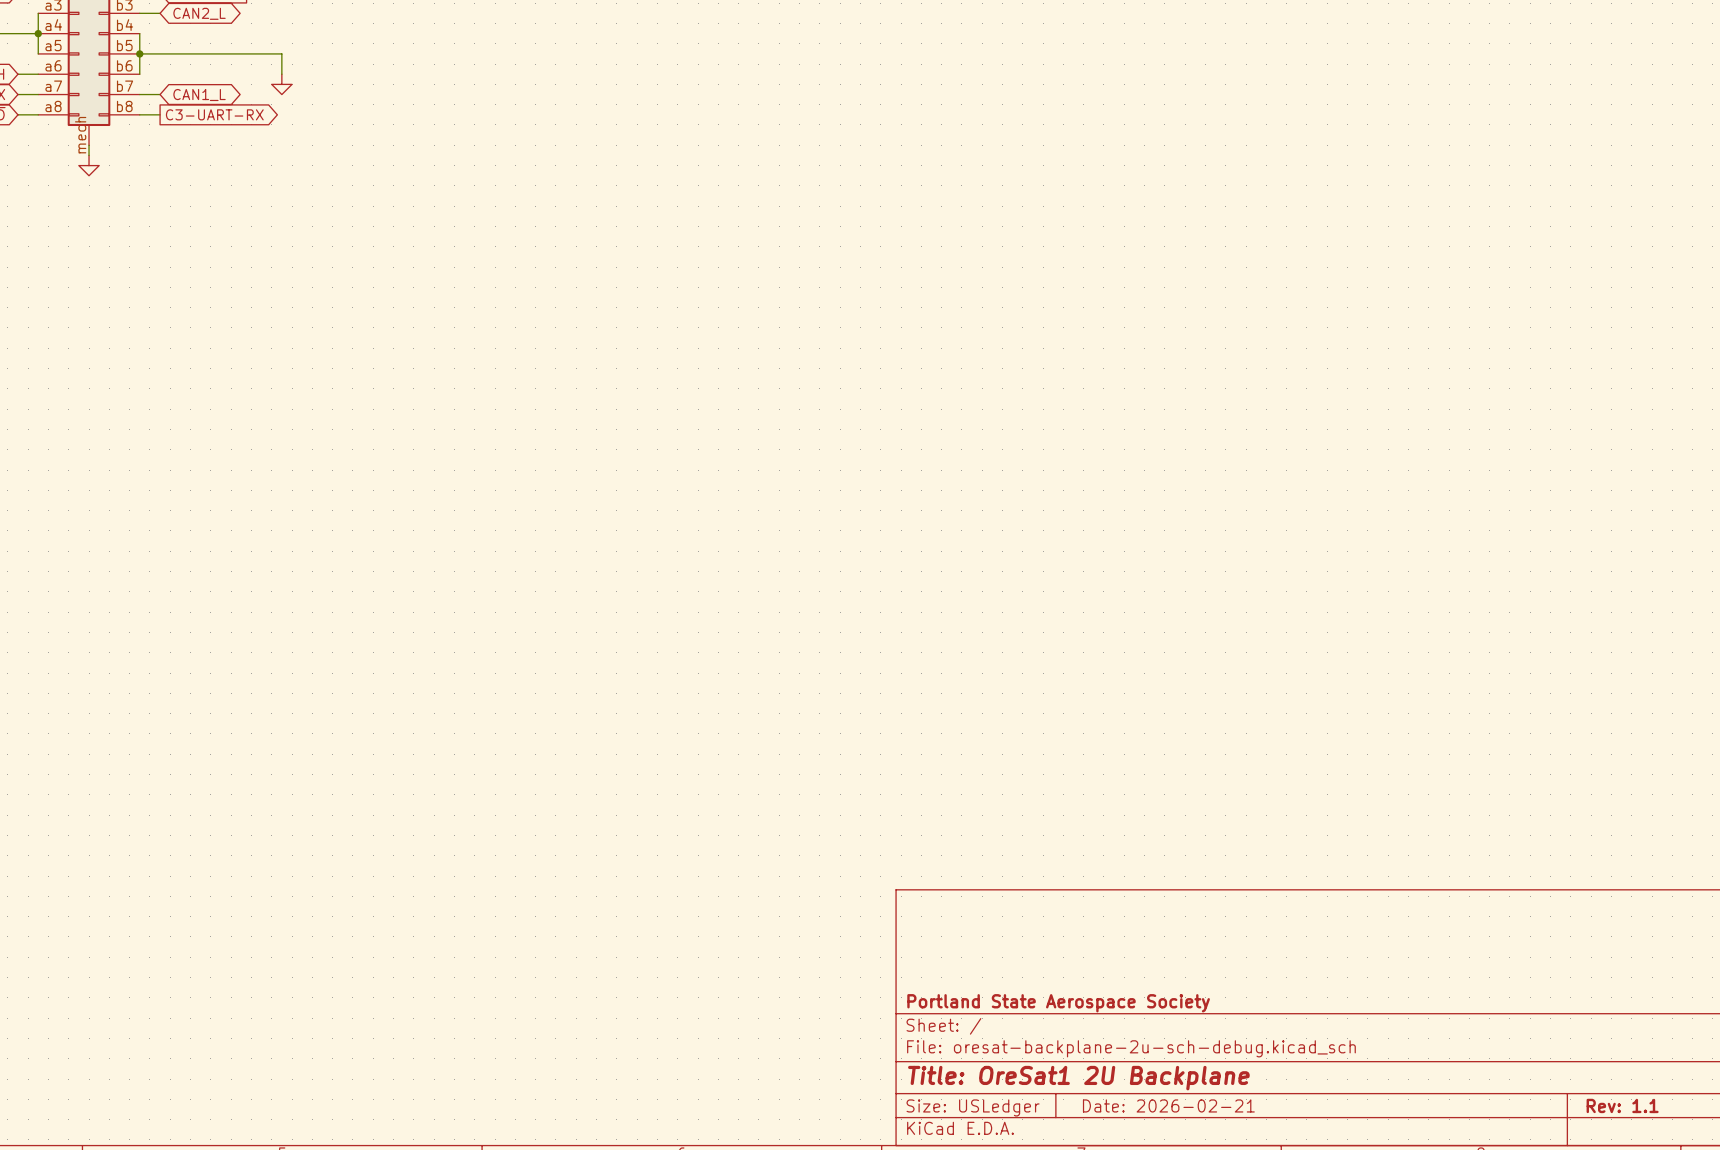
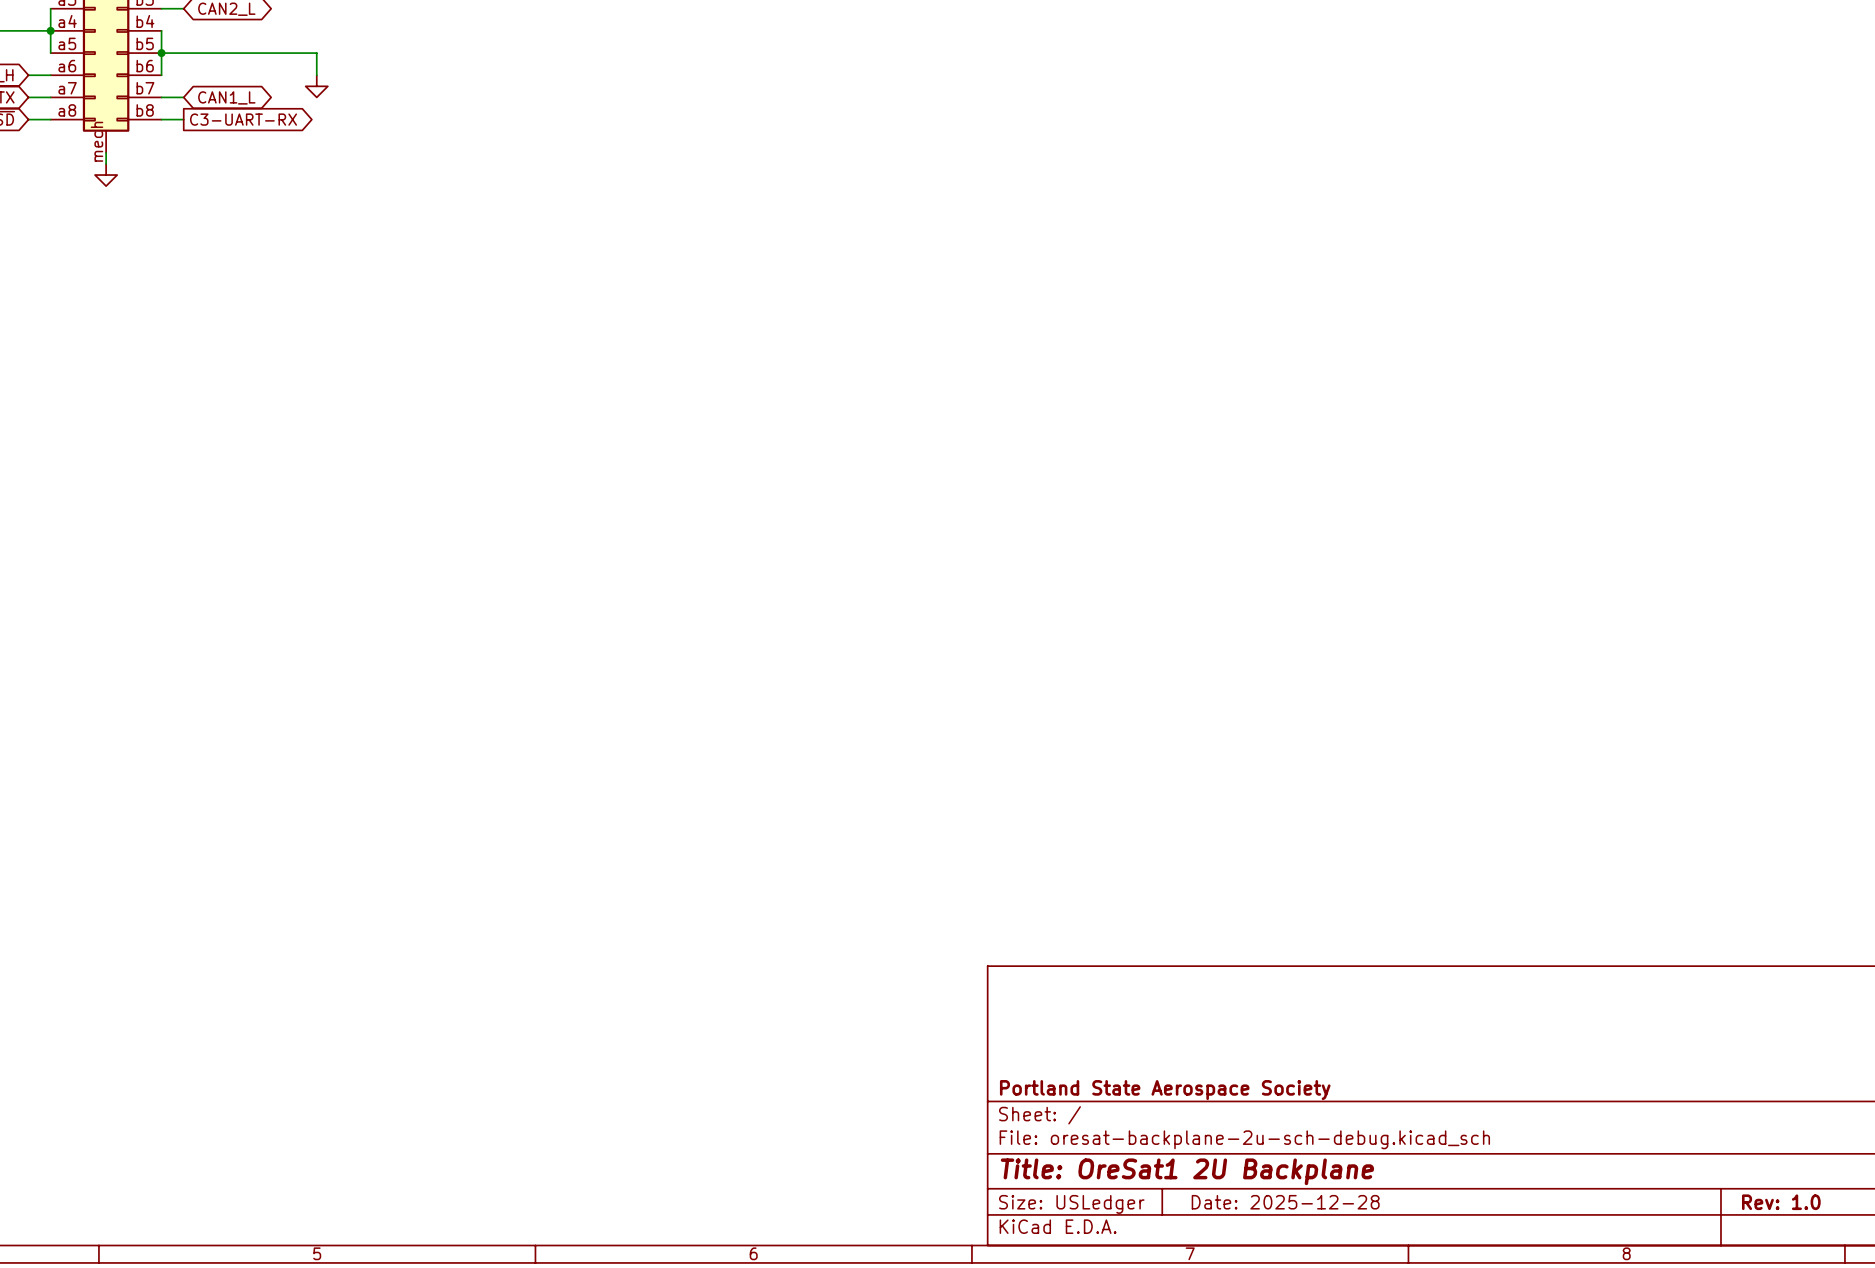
title block: Date: 2026-02-21 (1168, 1105) -> Date: 2025-12-28 (1285, 1202)
title block: Rev: 1.1 (1622, 1105) -> Rev: 1.0 (1781, 1202)

